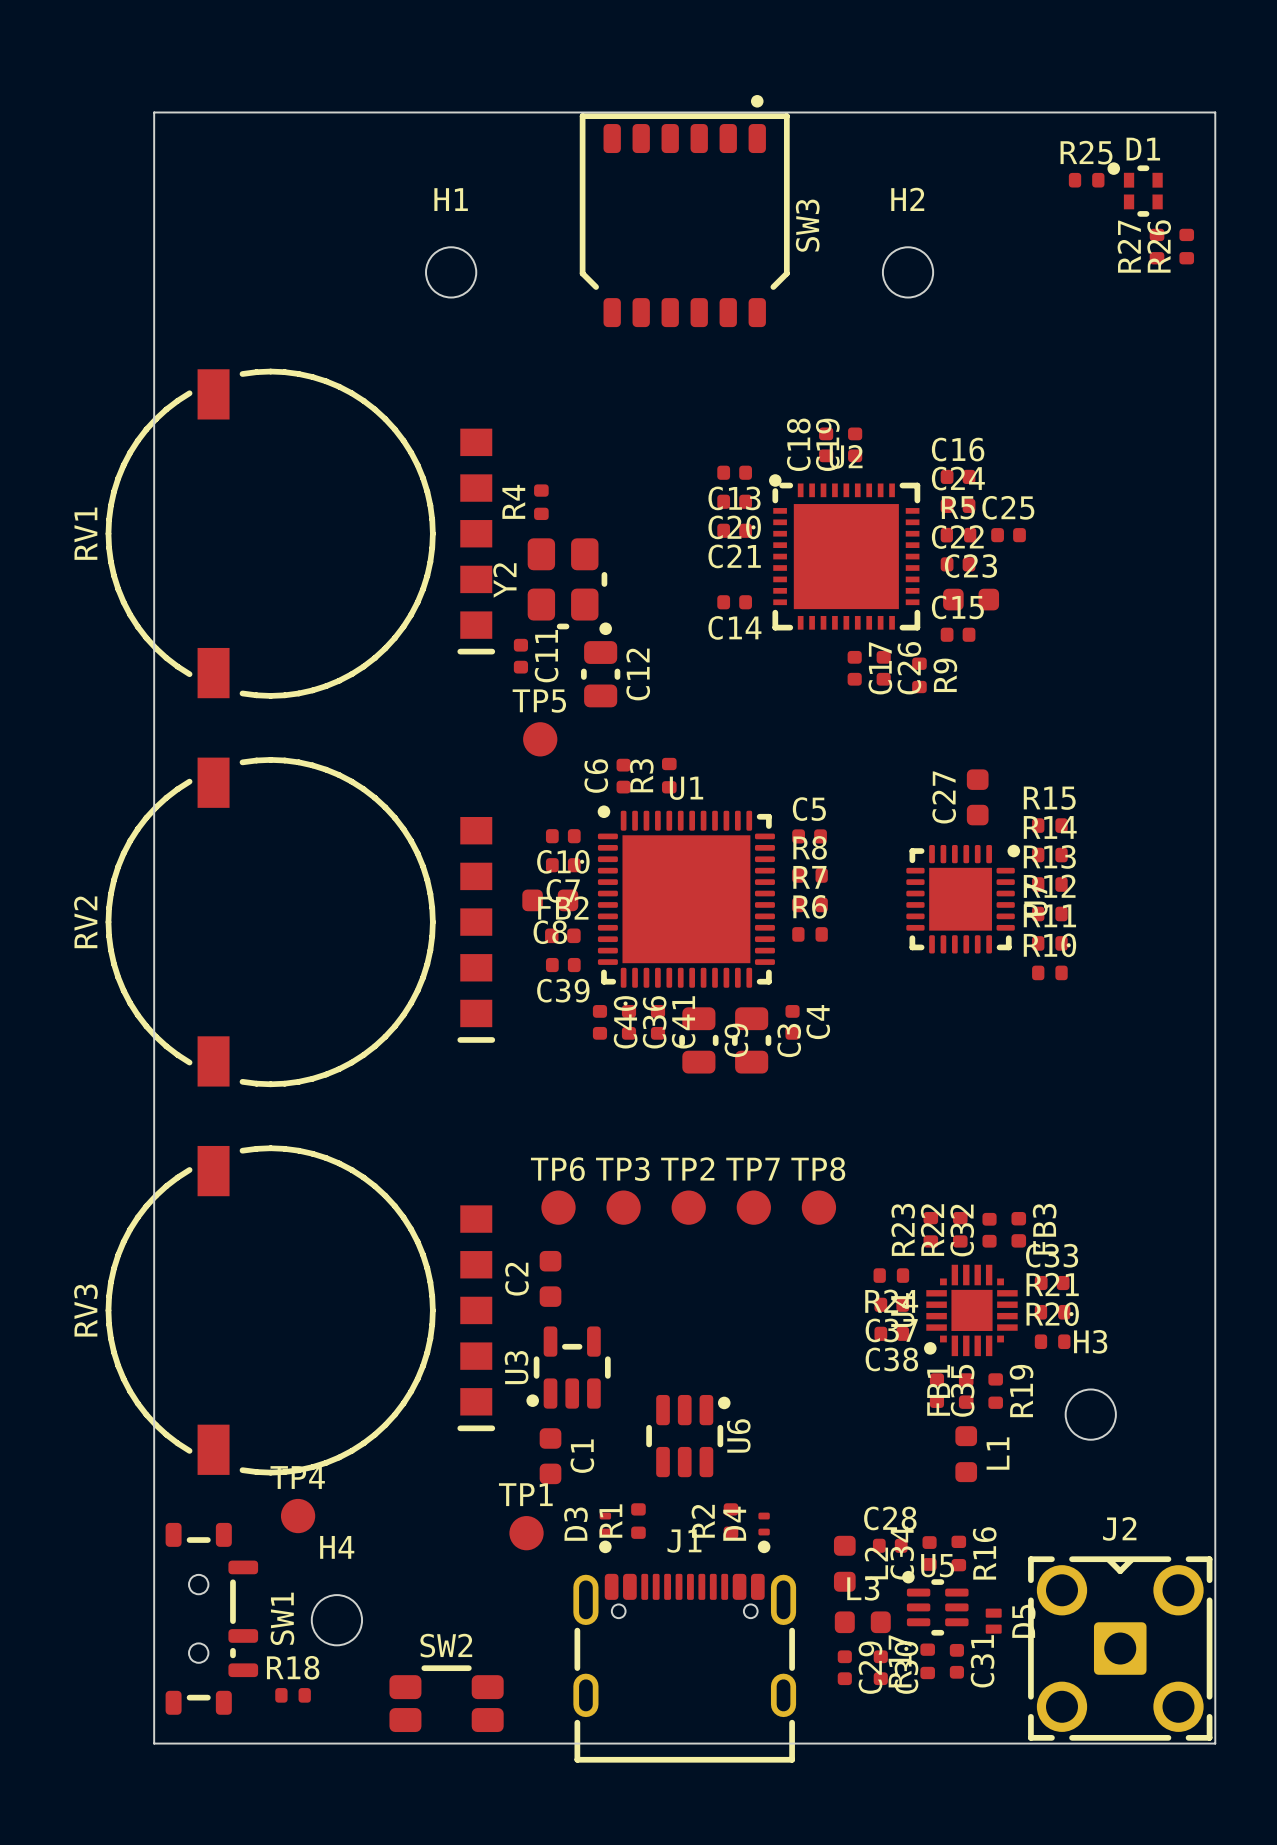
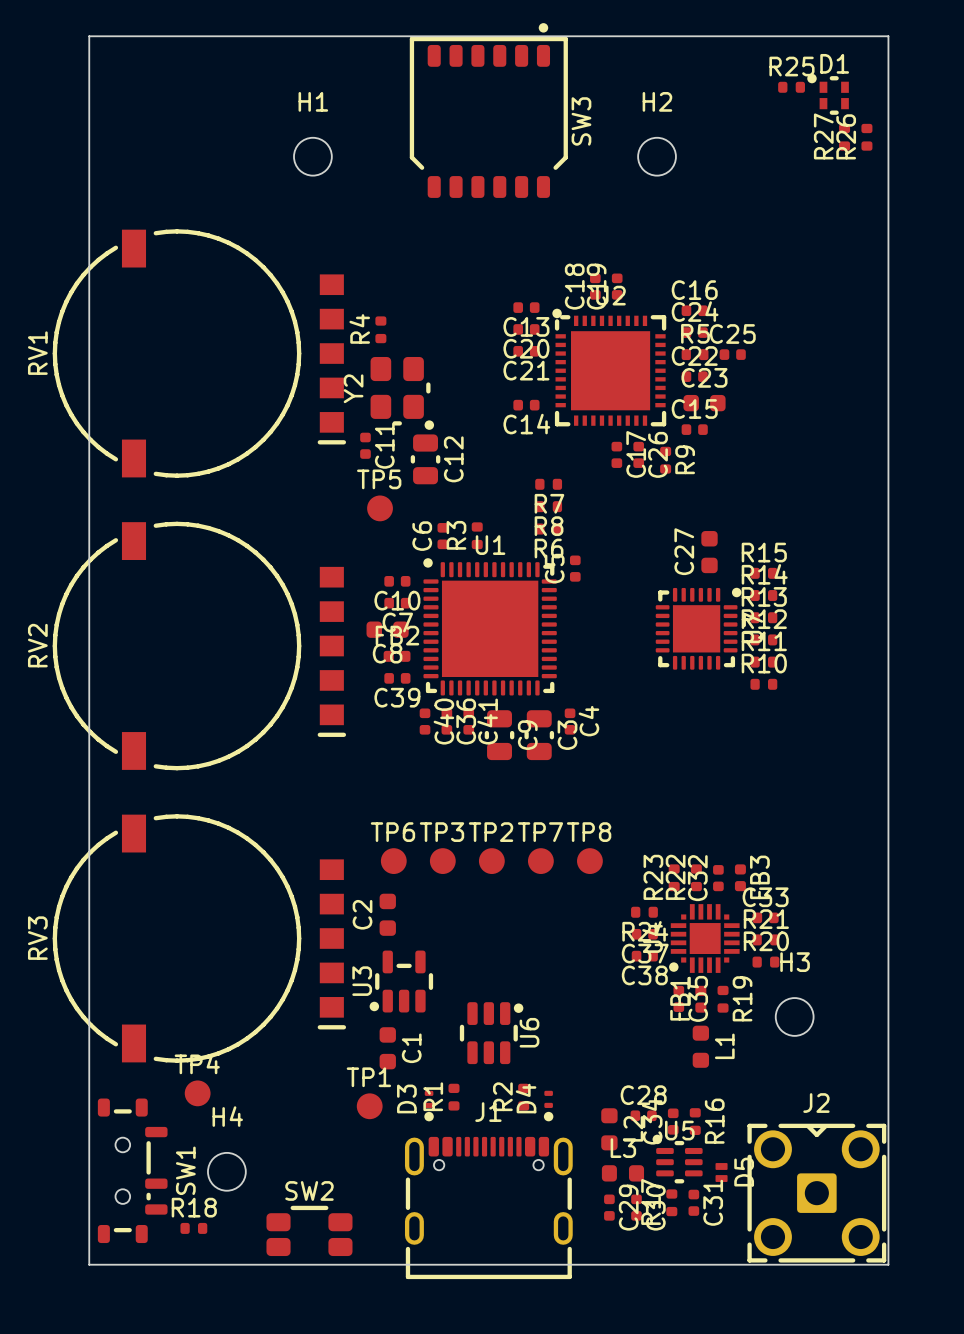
C5 rotation: 0° (809, 836) -> 90° clockwise (575, 568)
R8 name position: R8 (810, 847) -> R8 (549, 526)
R8 position: (810, 875) -> (548, 506)
R7 name position: R7 (809, 877) -> R7 (549, 503)
R7 position: (810, 904) -> (548, 484)
R6 name position: R6 (810, 906) -> R6 (549, 548)
R6 position: (810, 934) -> (548, 529)

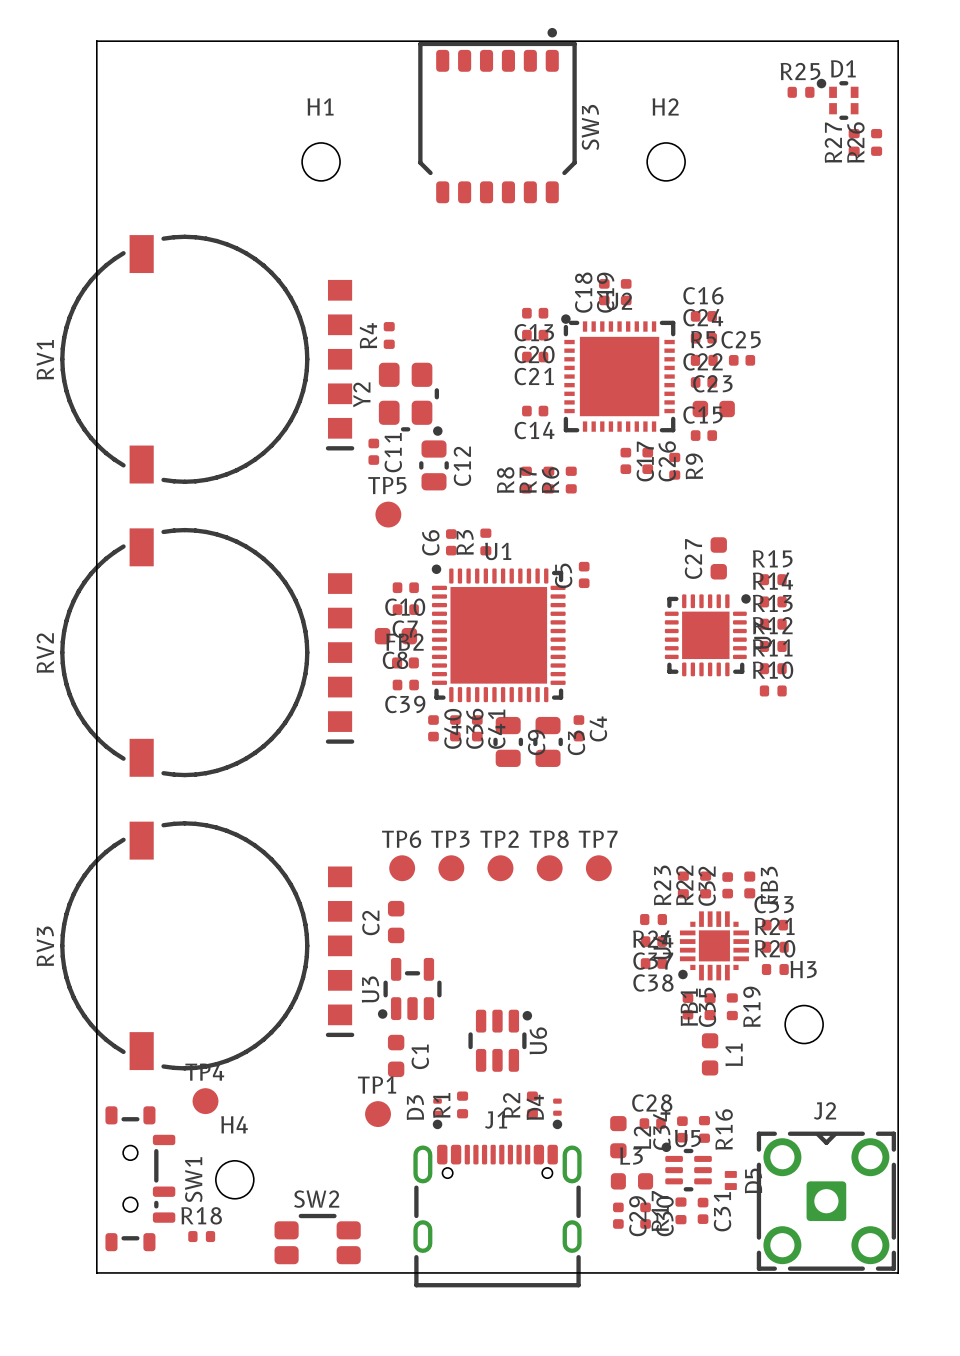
R7 rotation: 0° (548, 484) -> 90° clockwise (548, 480)
R8 rotation: 0° (548, 506) -> 90° clockwise (526, 480)
R8 position: (548, 506) -> (526, 480)
R6 rotation: 0° (548, 529) -> 90° clockwise (571, 480)
R6 position: (548, 529) -> (571, 480)
TP7 name: TP7 (540, 832) -> TP8 (549, 839)
TP8 name: TP8 (589, 832) -> TP7 (598, 839)

